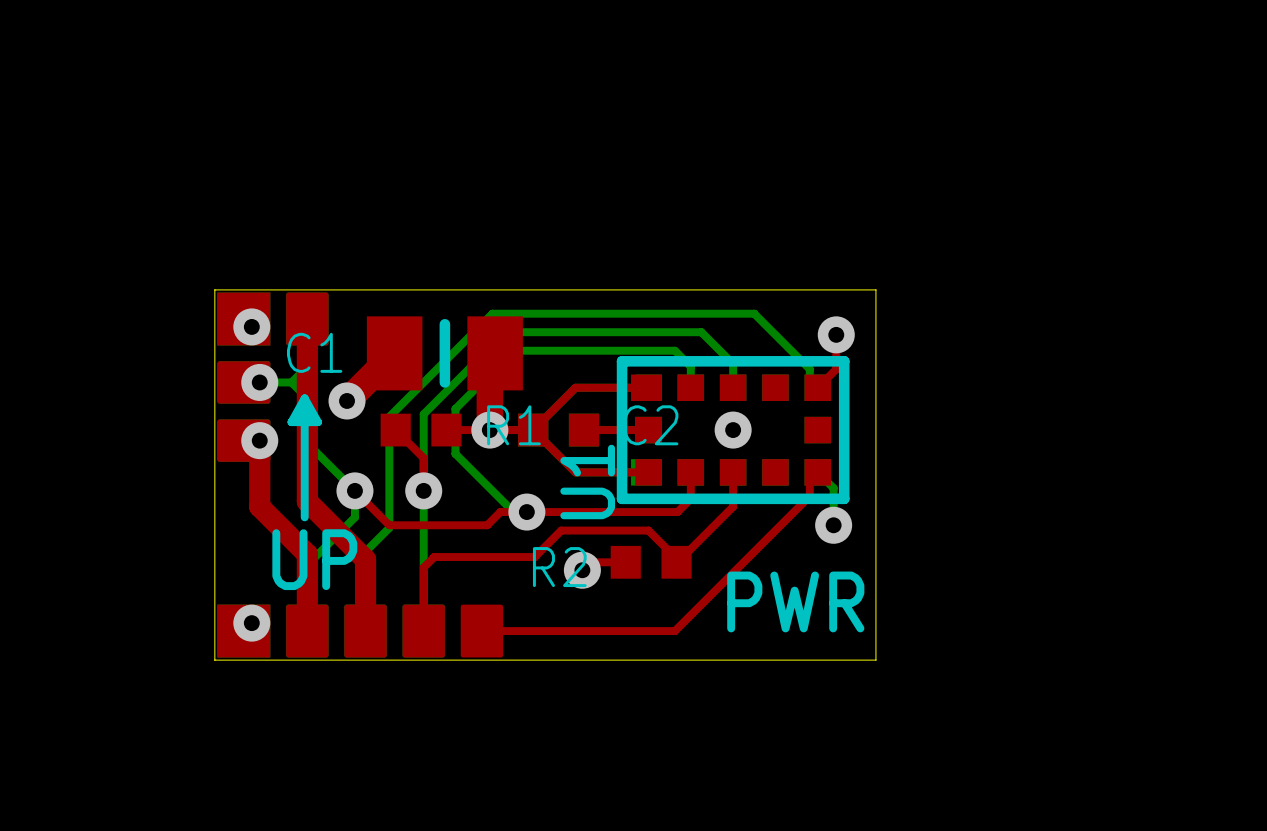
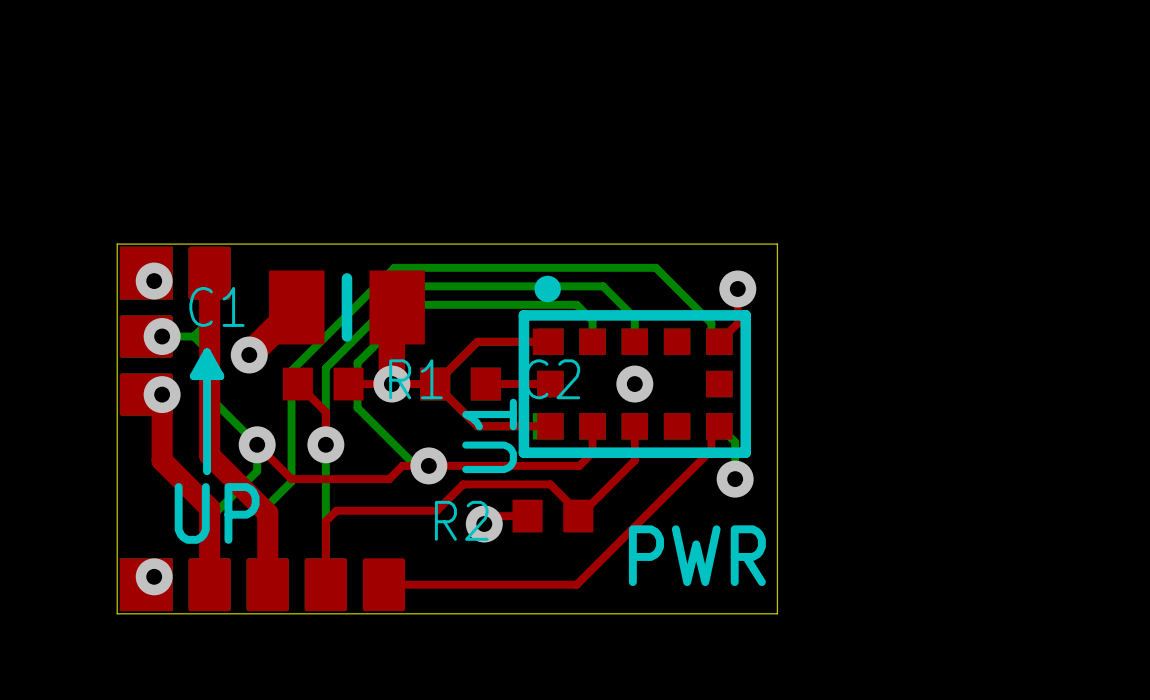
drawing: none -> [534, 275, 561, 303]

